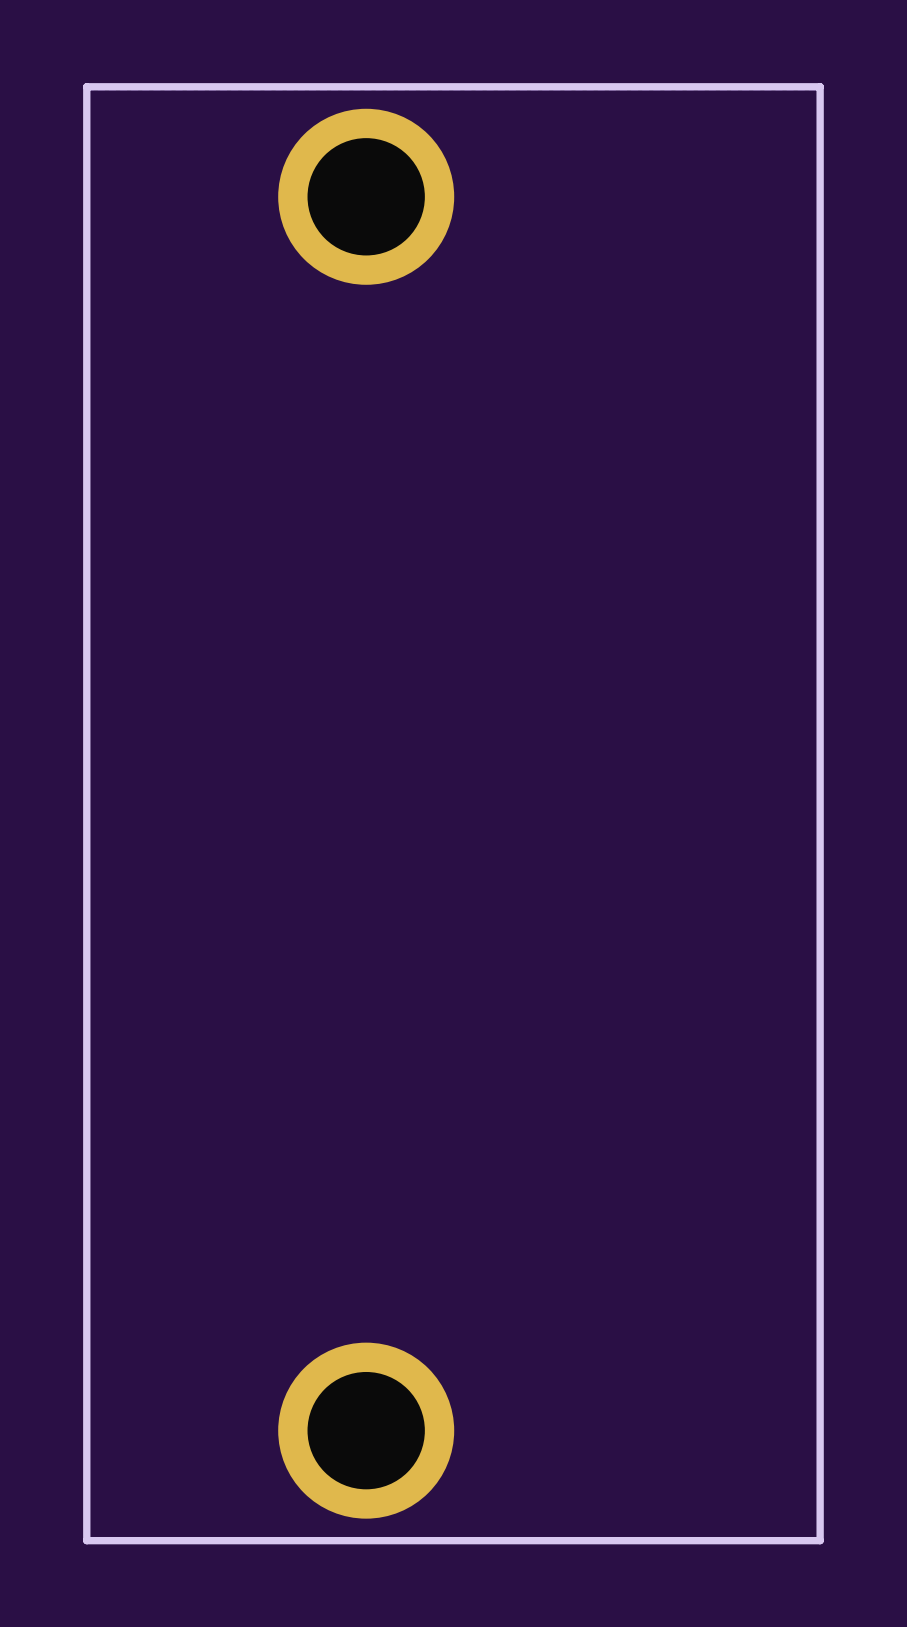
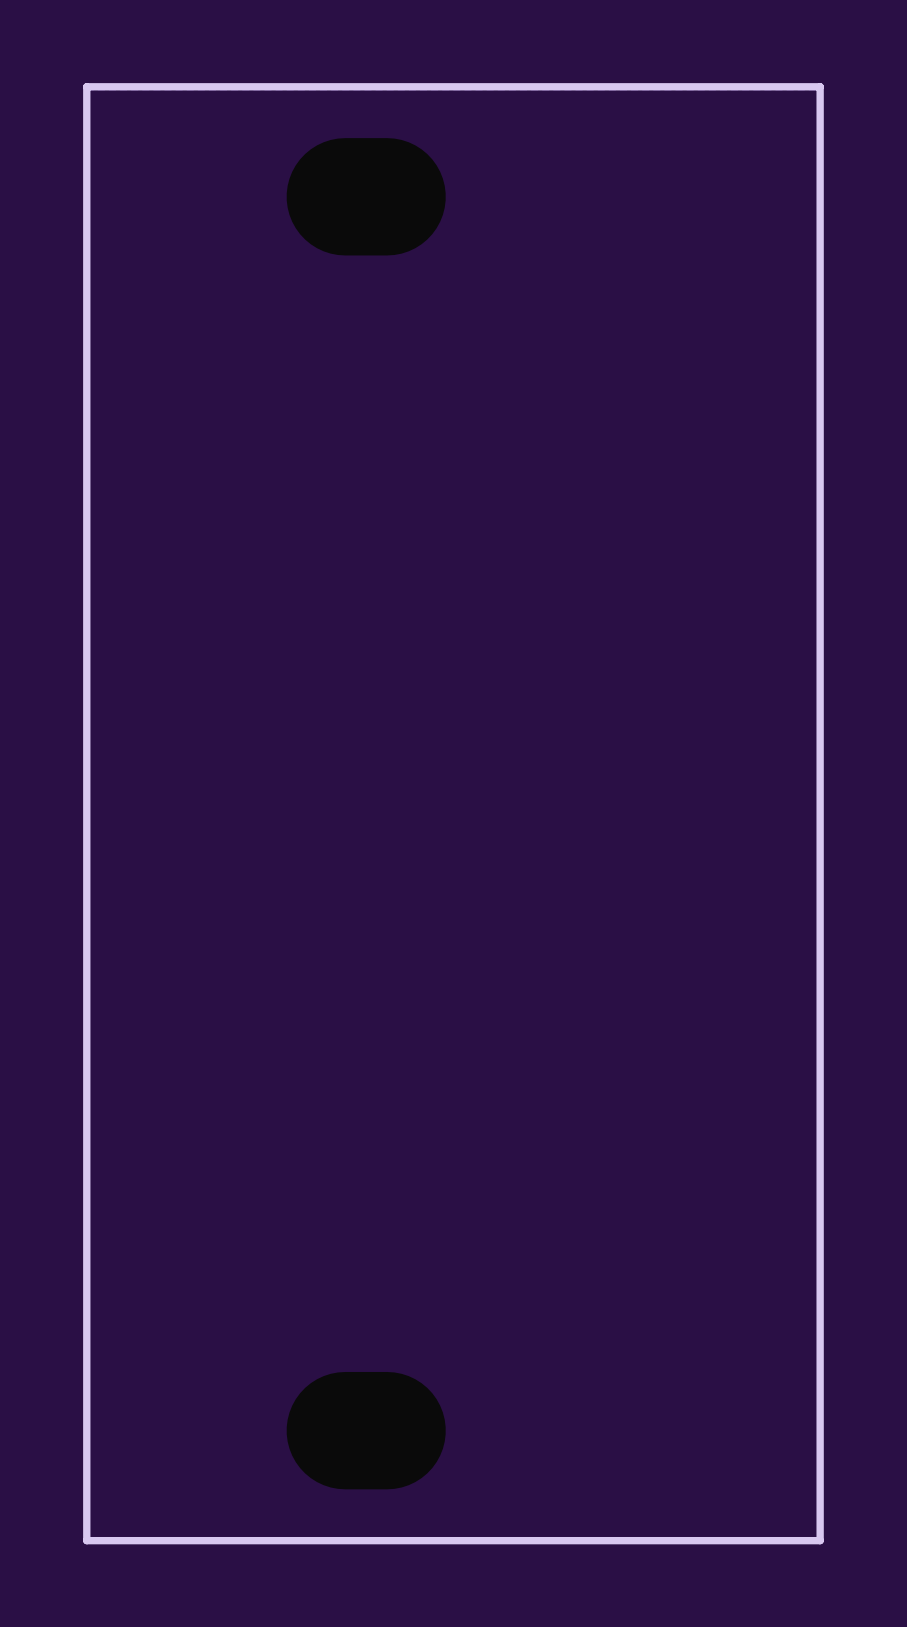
part footprint: [278, 108, 455, 285] -> [286, 138, 446, 256]
part footprint: [278, 1342, 455, 1519] -> [286, 1371, 446, 1490]

